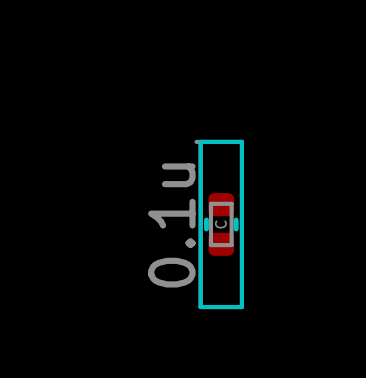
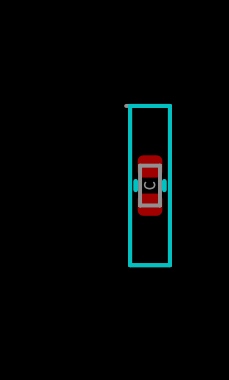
C value: 0.1u (171, 225) -> none

